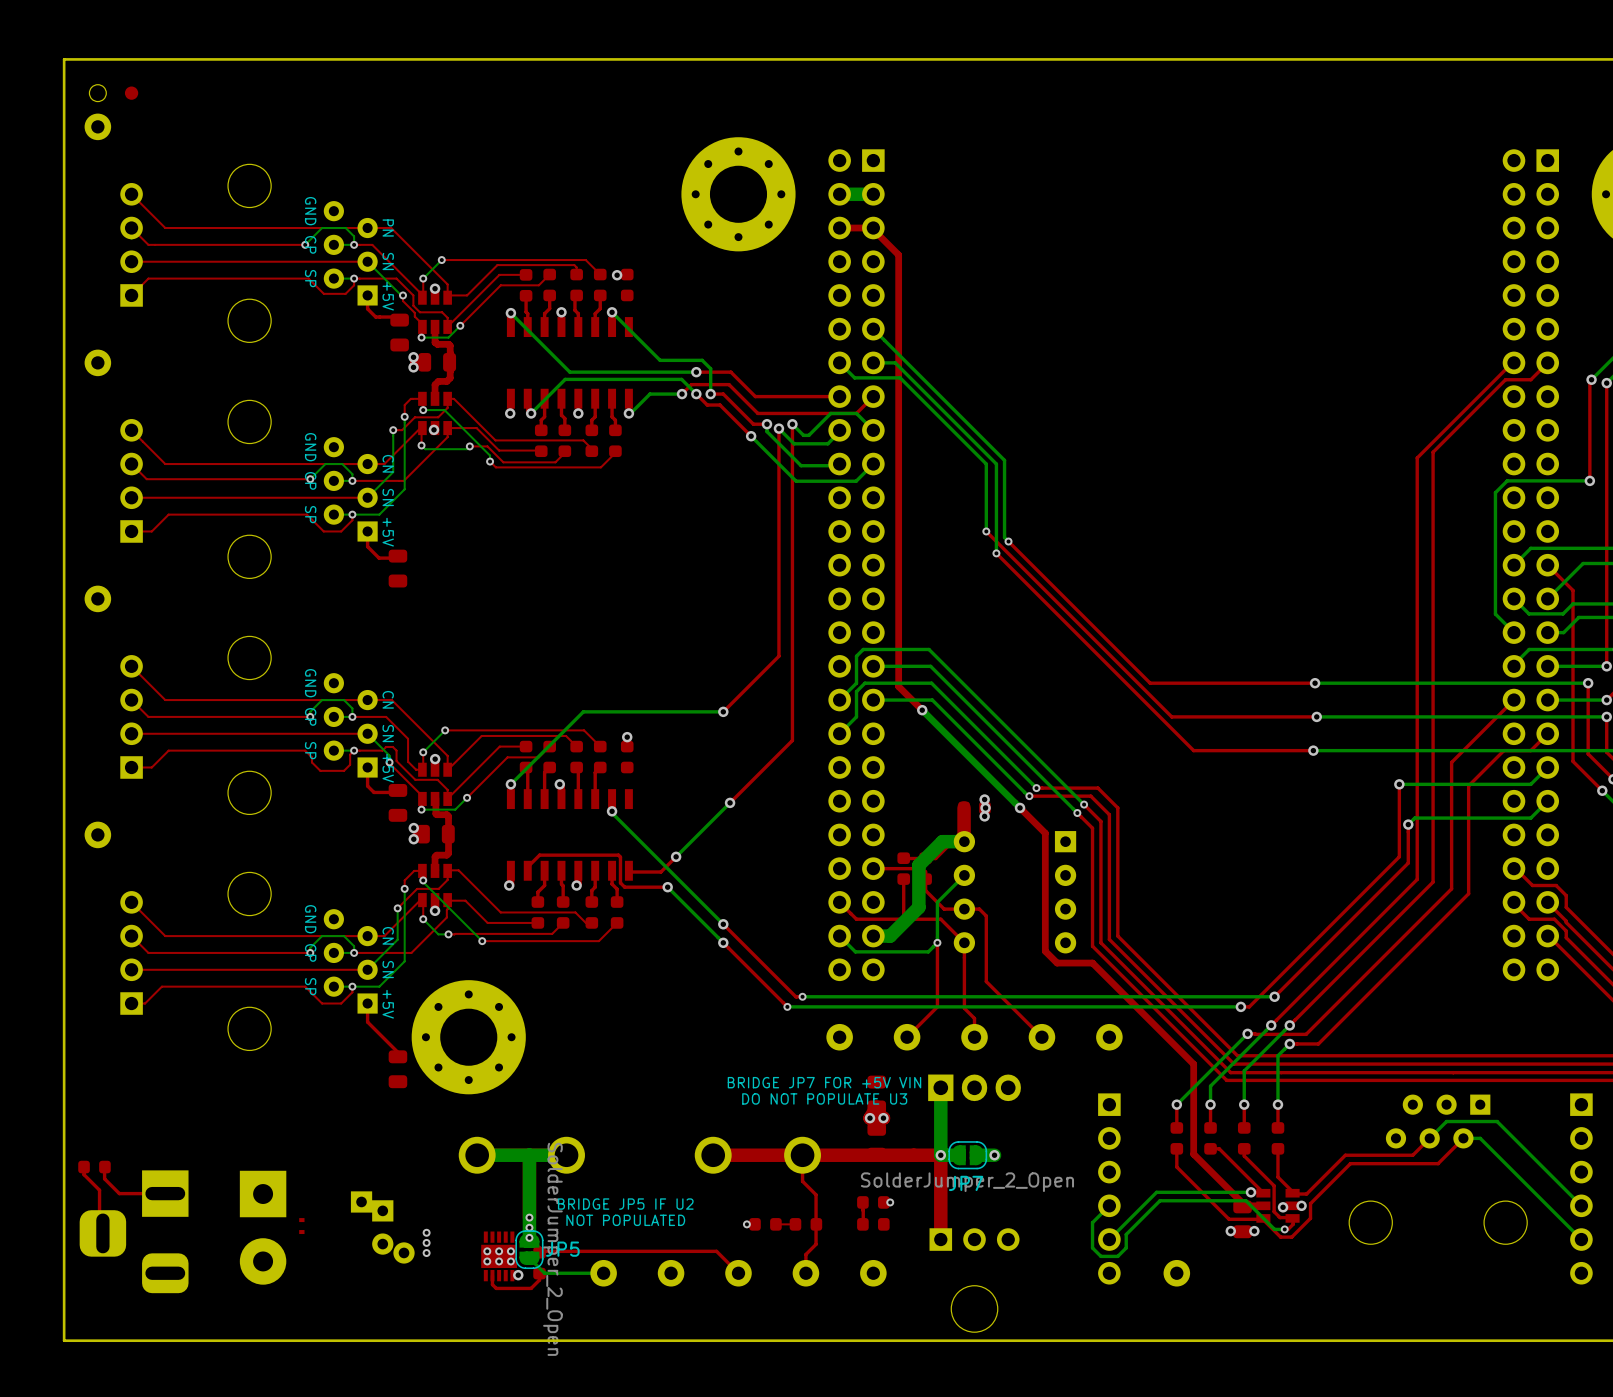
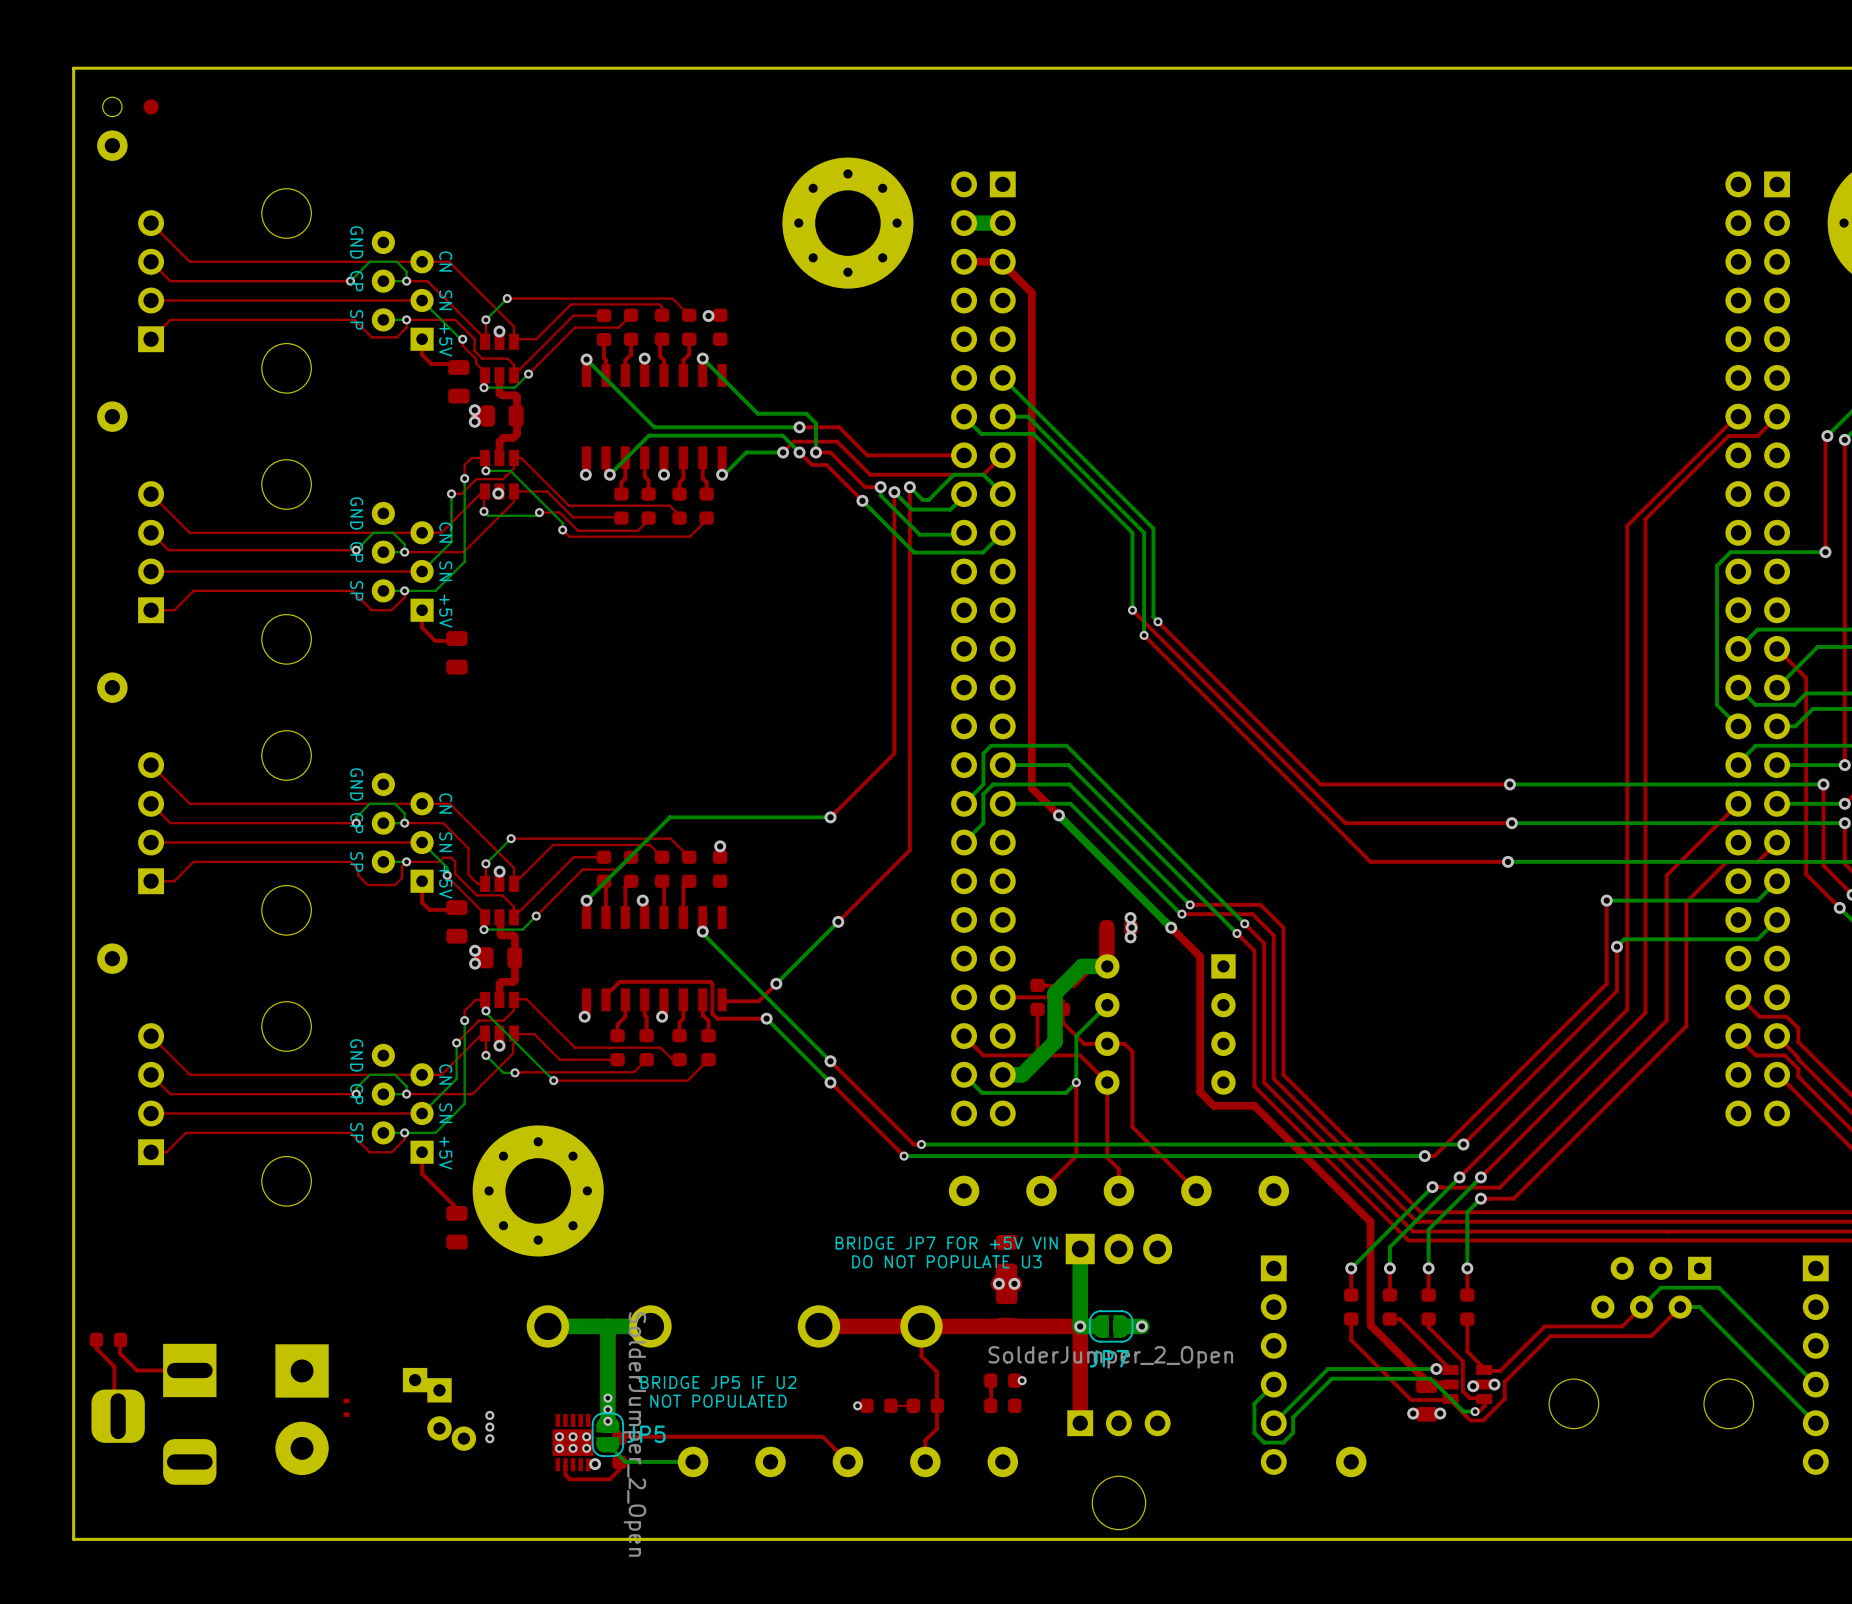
text: PN (388, 228) -> CN (445, 261)

